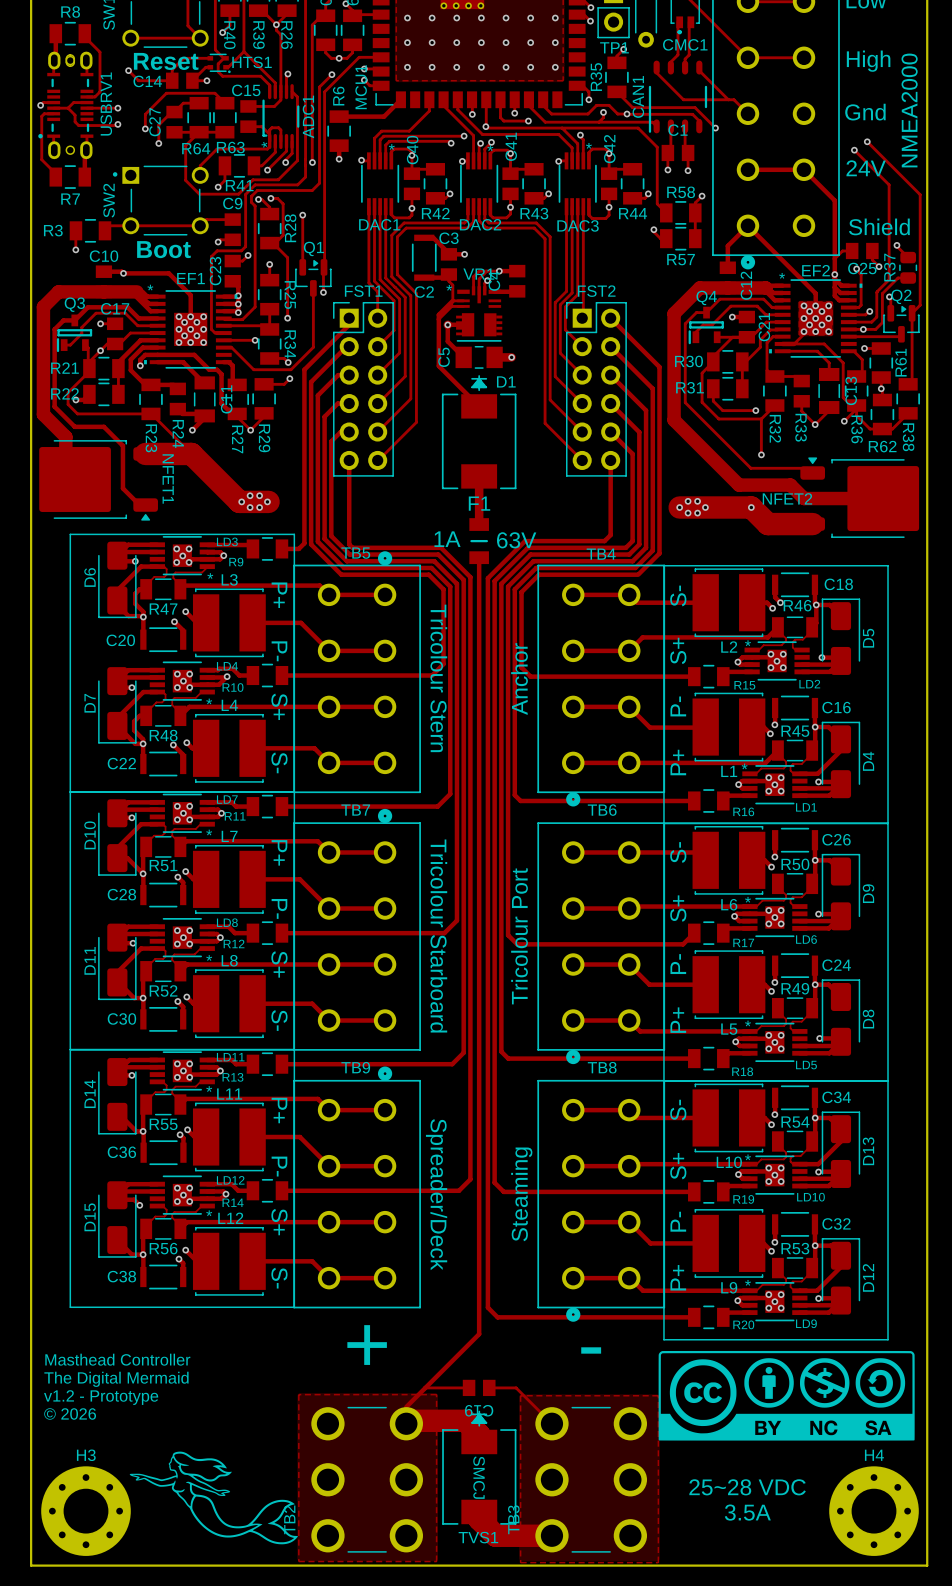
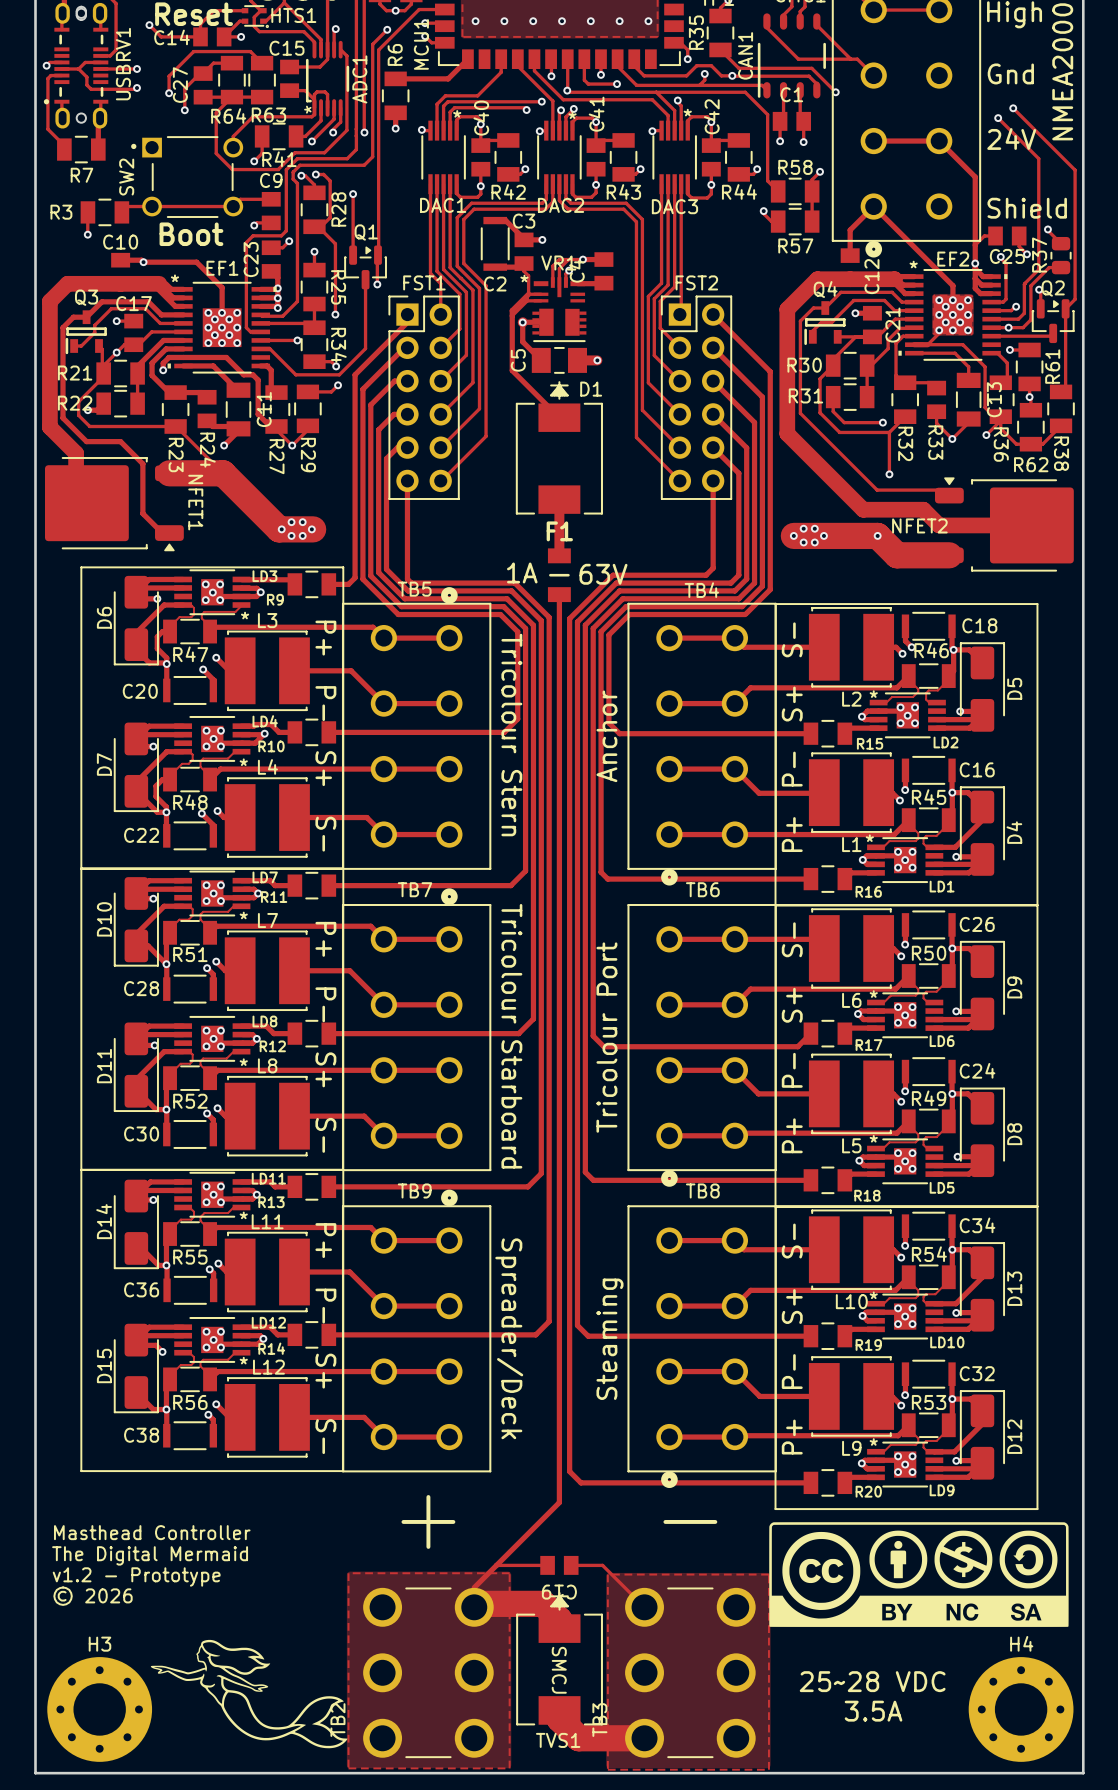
track: (631, 906) (749, 906) -> (737, 1002) (750, 989) (895, 989) (908, 976)
track: (629, 1020) (640, 1031) (749, 1031) -> (734, 1135) (737, 1133) (896, 1133) (908, 1121)
track: (631, 1164) (749, 1164) -> (737, 1303) (750, 1290) (895, 1290) (908, 1277)
track: (629, 1278) (642, 1290) (749, 1290) -> (734, 1437) (898, 1435) (908, 1425)

